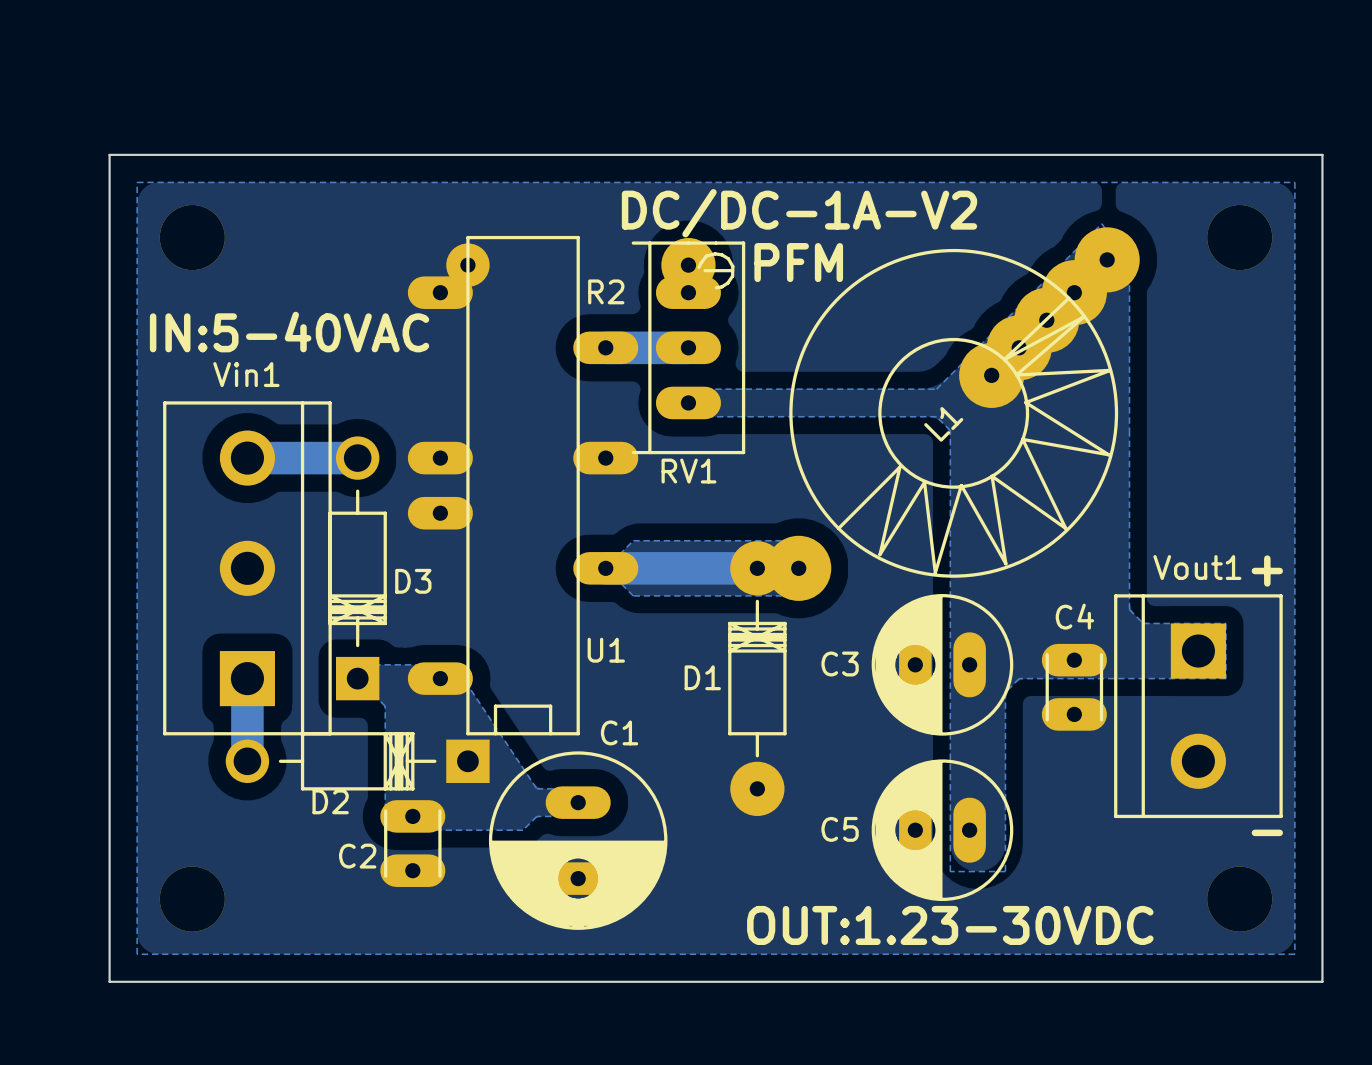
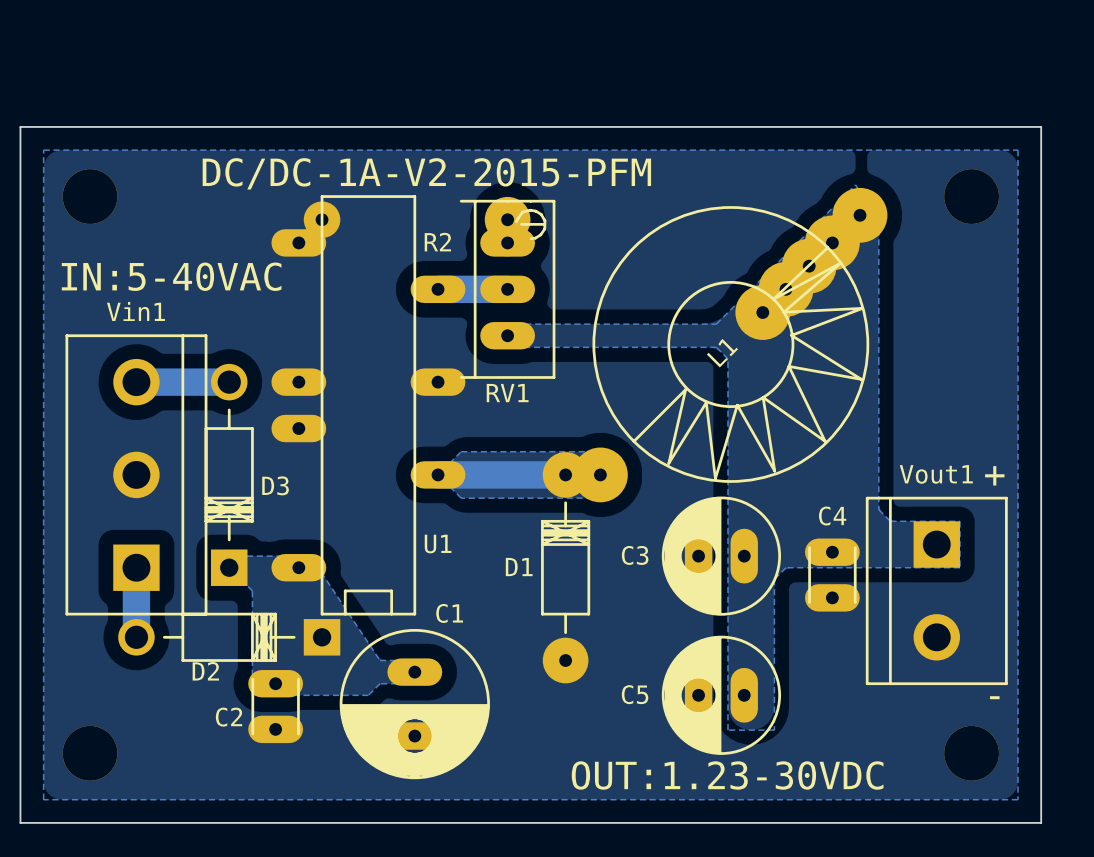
text: DC/DC-1A-V2 (799, 213) -> DC/DC-1A-V2-2015-PFM (426, 173)
text: PFM (798, 262) -> none

